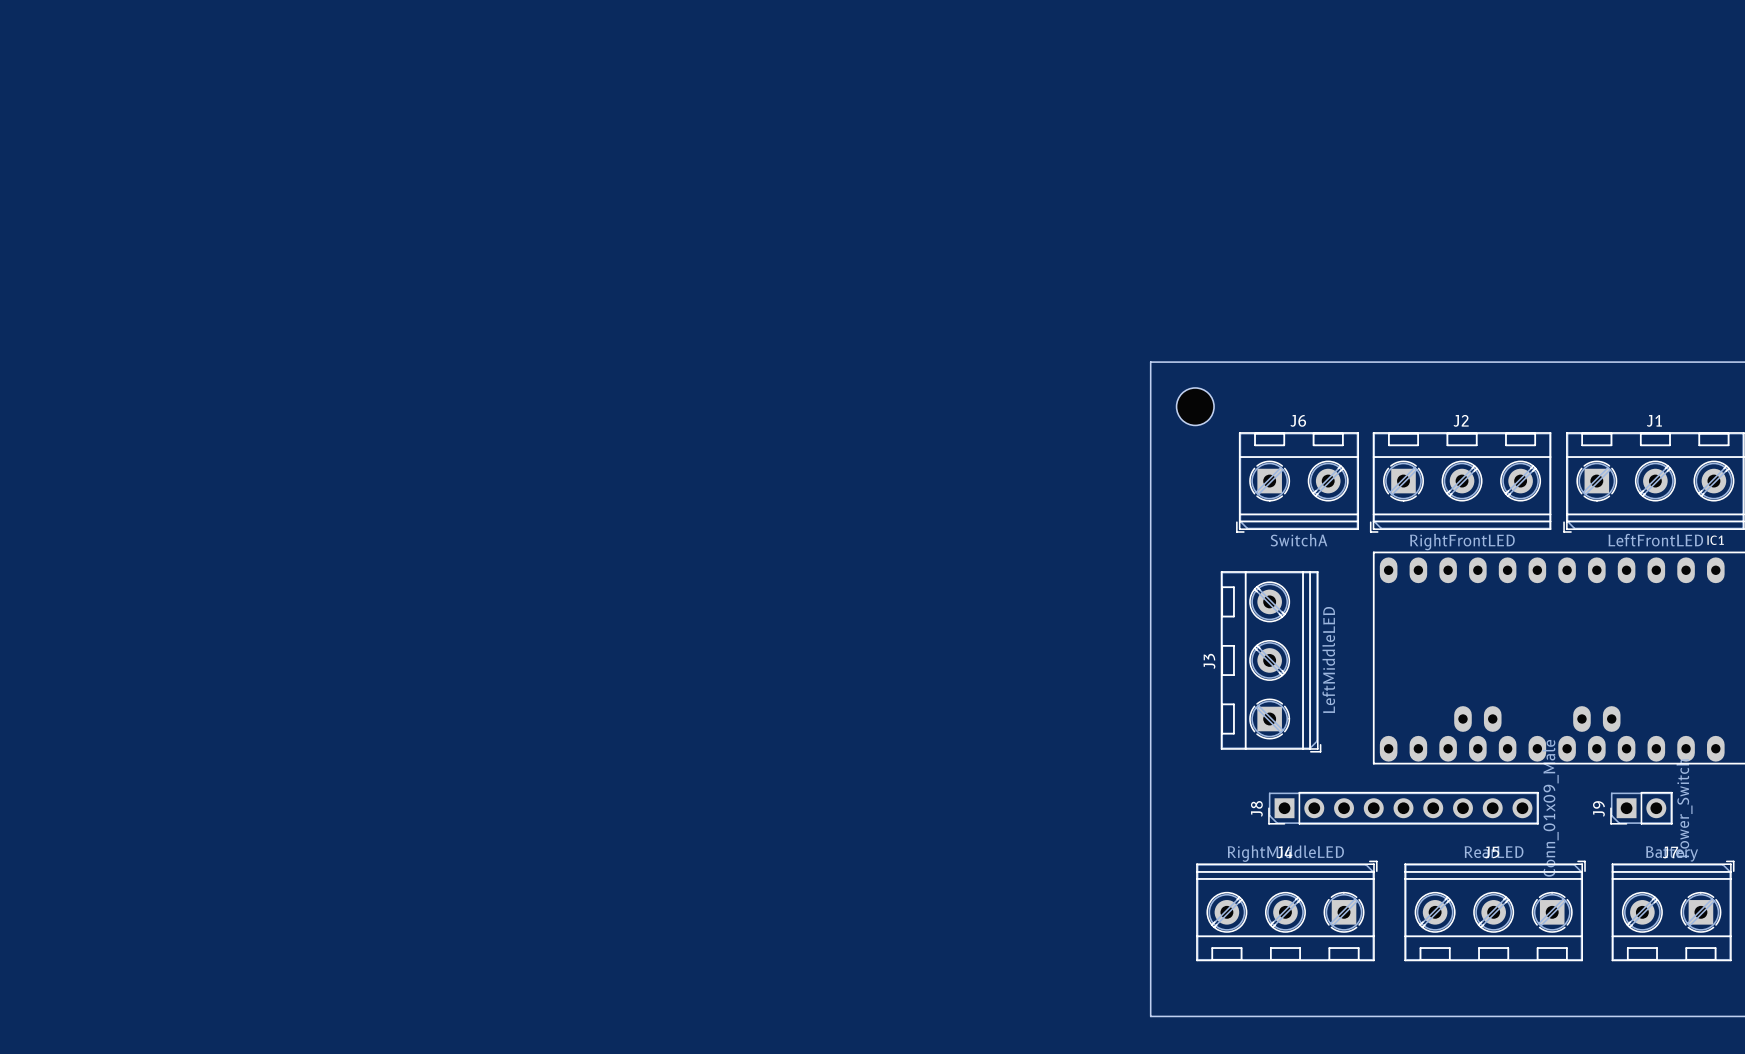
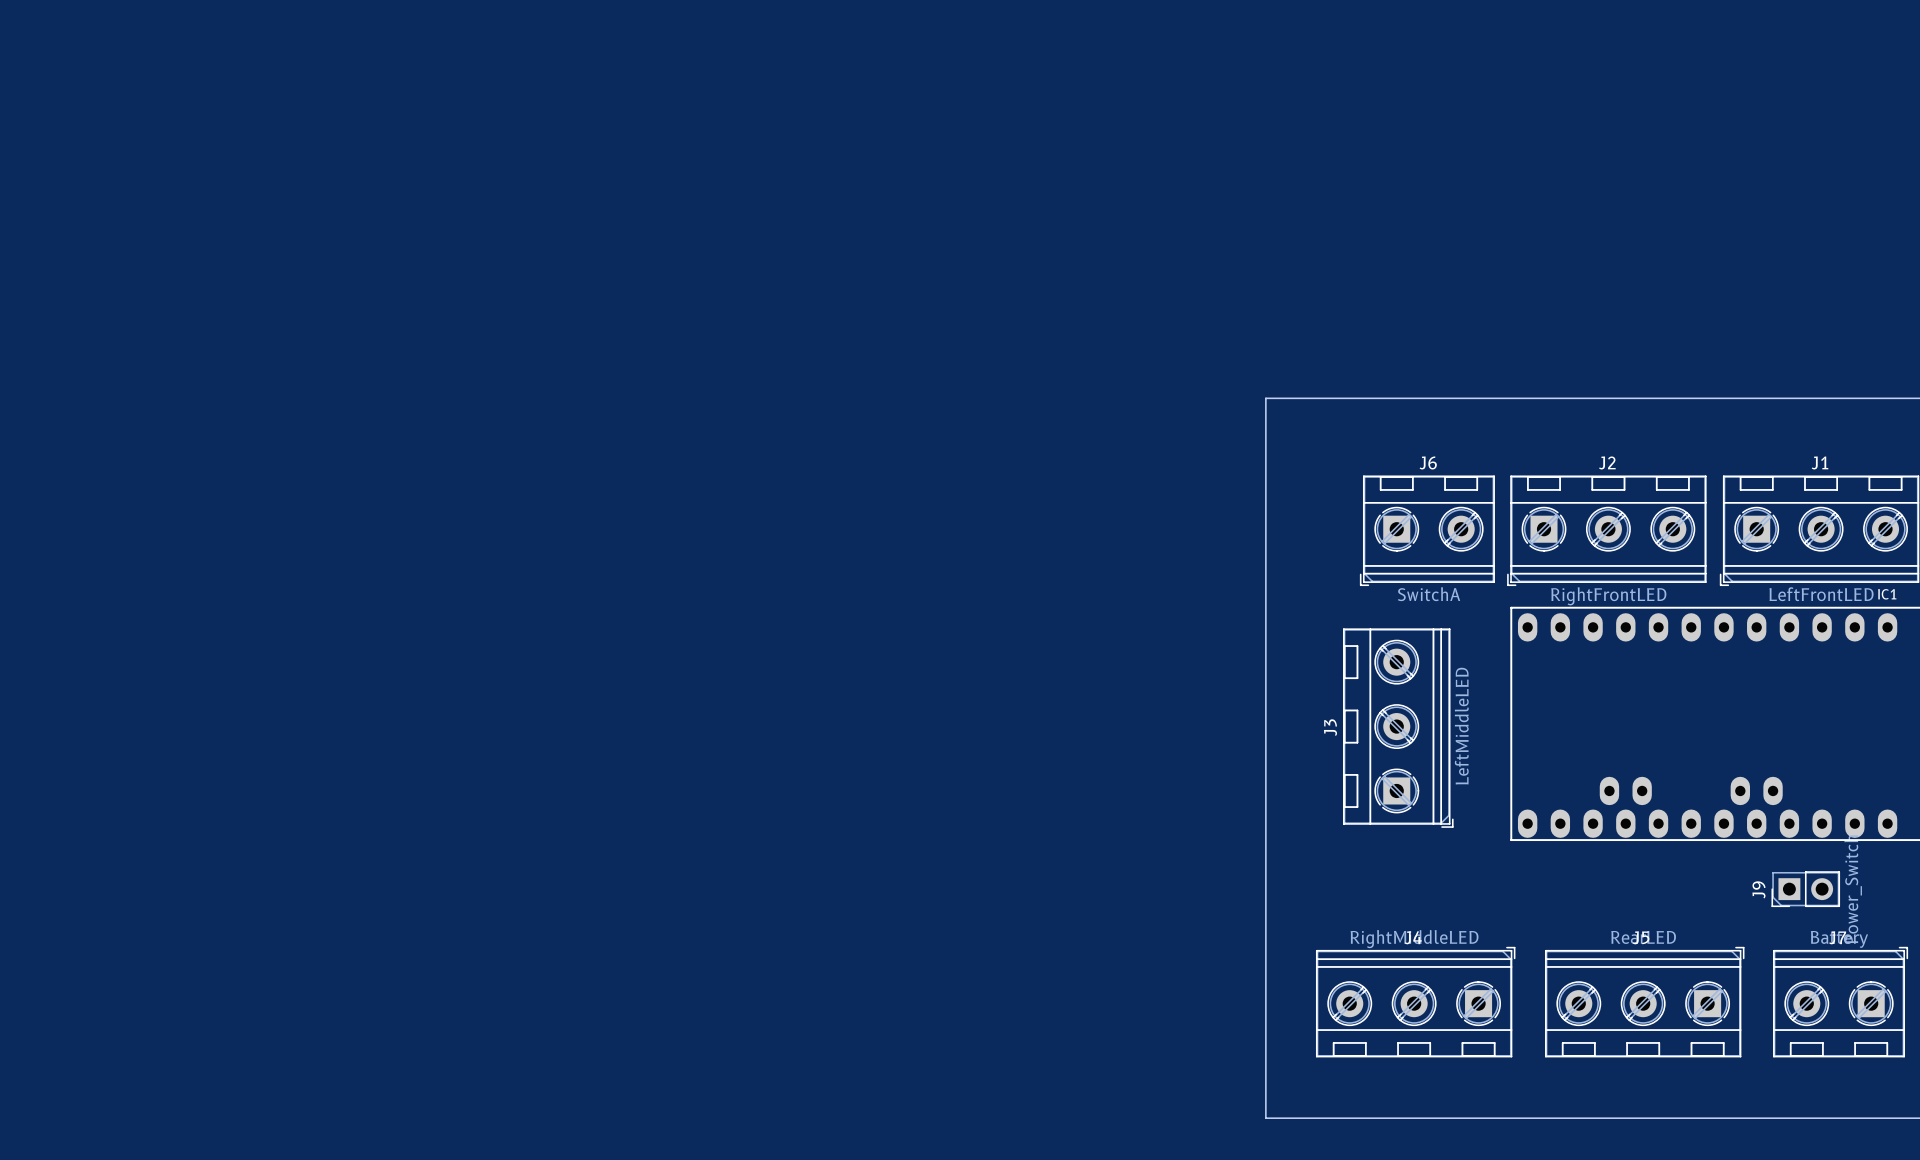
part: (1195, 406) -> none
J8: Conn_01x09_Male (1403, 808) -> none

